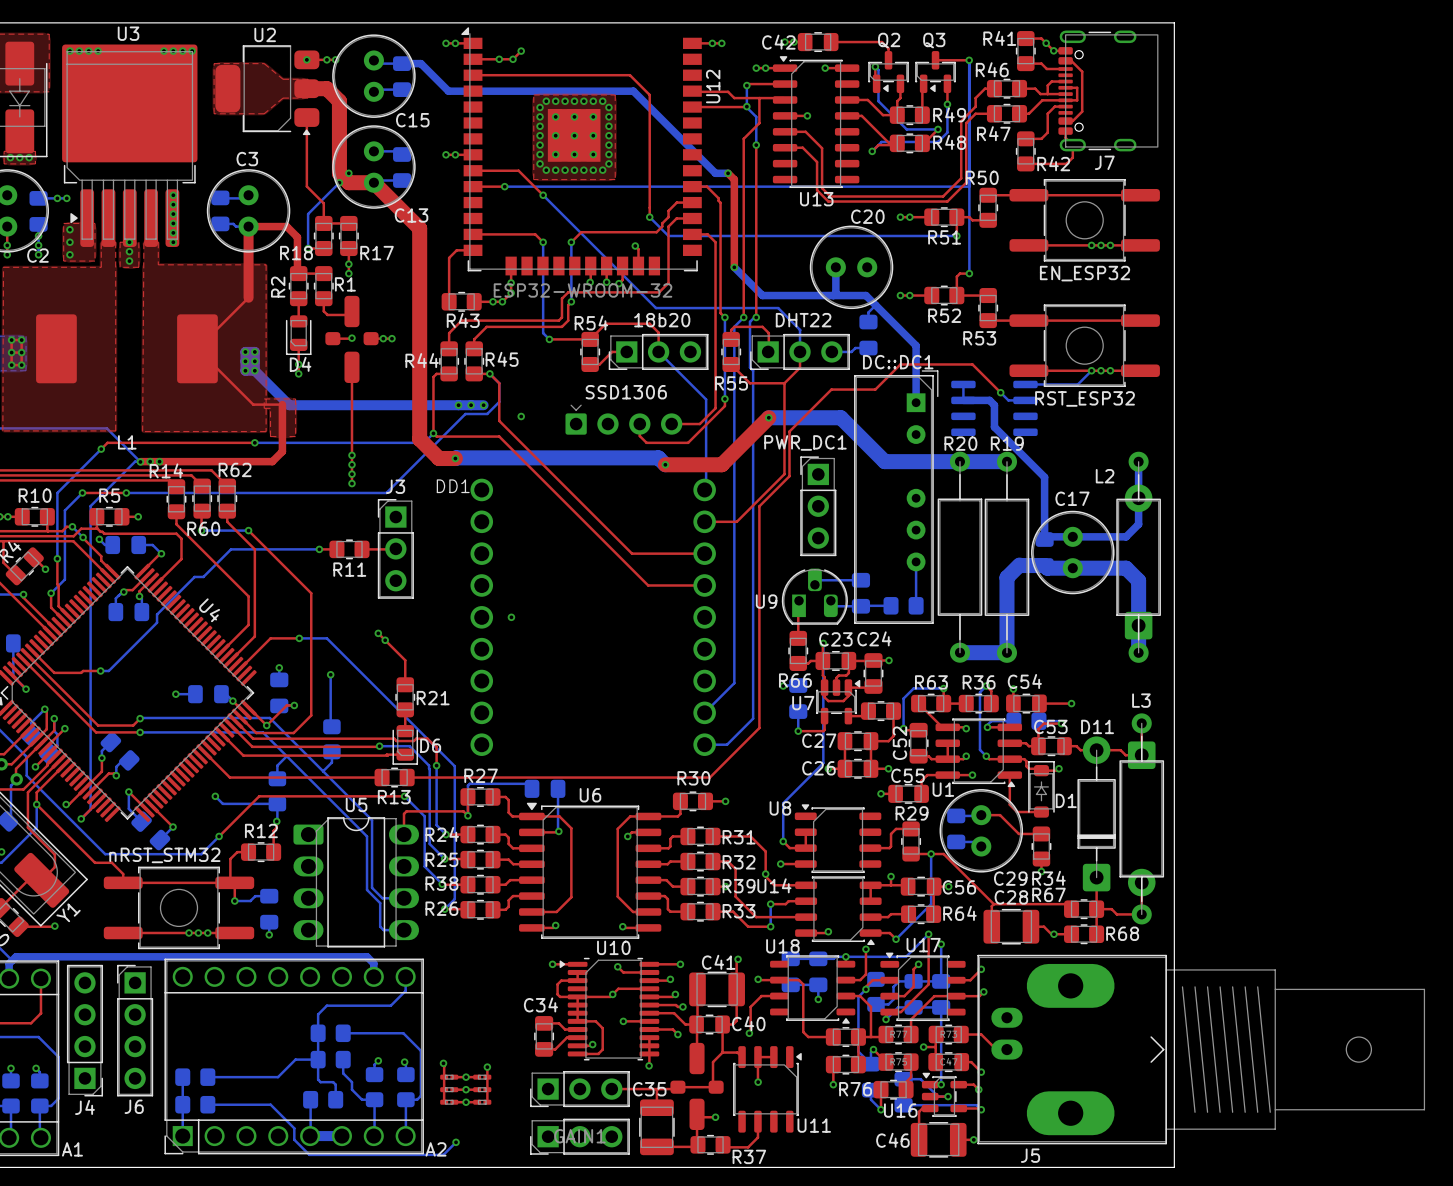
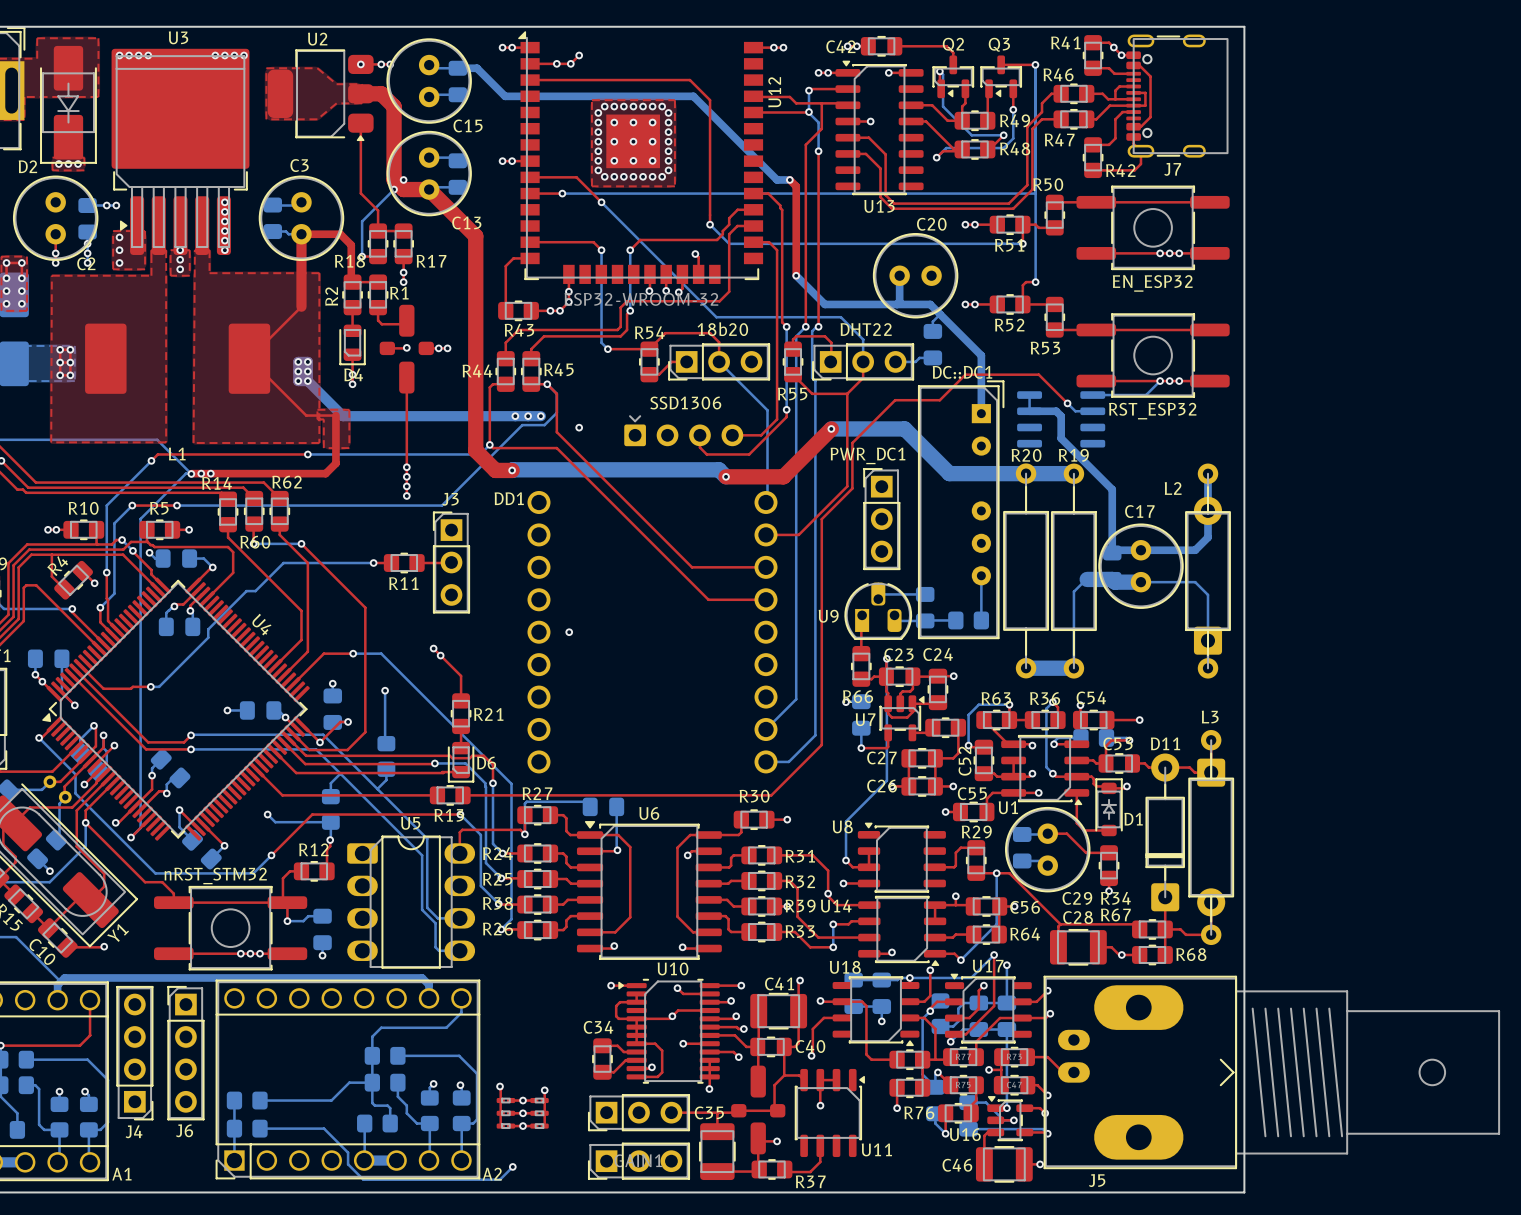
bottom track width: thick (1019, 565) (1006, 577) (1006, 652) -> thin (1086, 578) (1073, 591) (1073, 668)
bottom track width: thick (1072, 568) (1126, 568) (1138, 580) (1138, 652) -> thin (1140, 582) (1195, 582) (1207, 594) (1207, 668)

